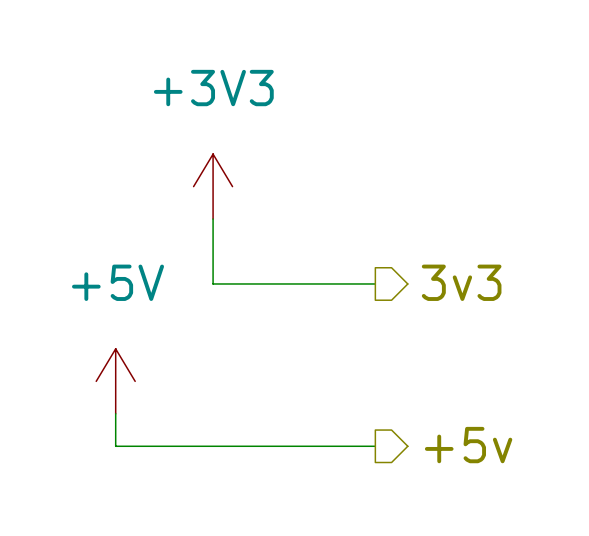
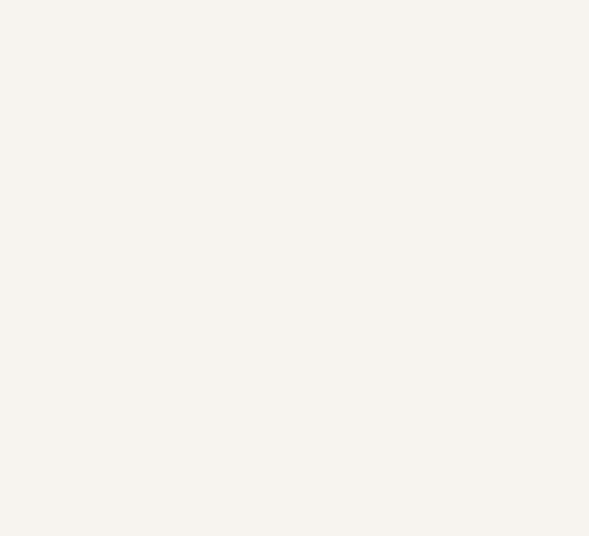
power symbol: +3V3 (213, 186) -> none
wire: (213, 219) (213, 283) (375, 283) -> none
hierarchical label: 3v3 (461, 282) -> none
power symbol: +5V (115, 381) -> none
wire: (115, 413) (115, 446) (375, 446) -> none
hierarchical label: +5v (468, 445) -> none

